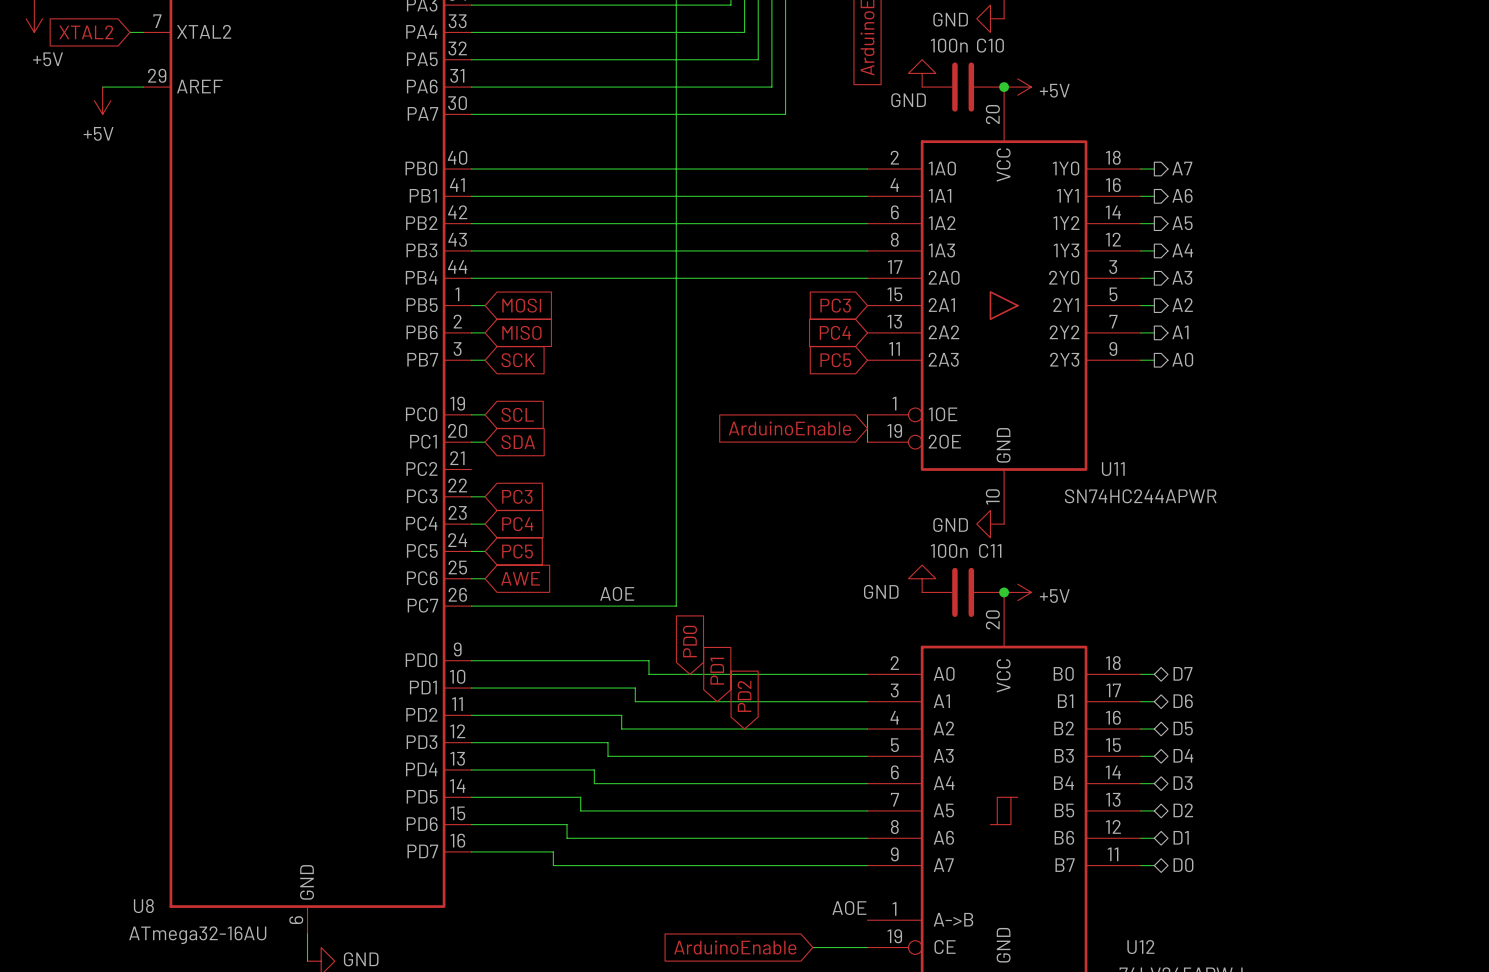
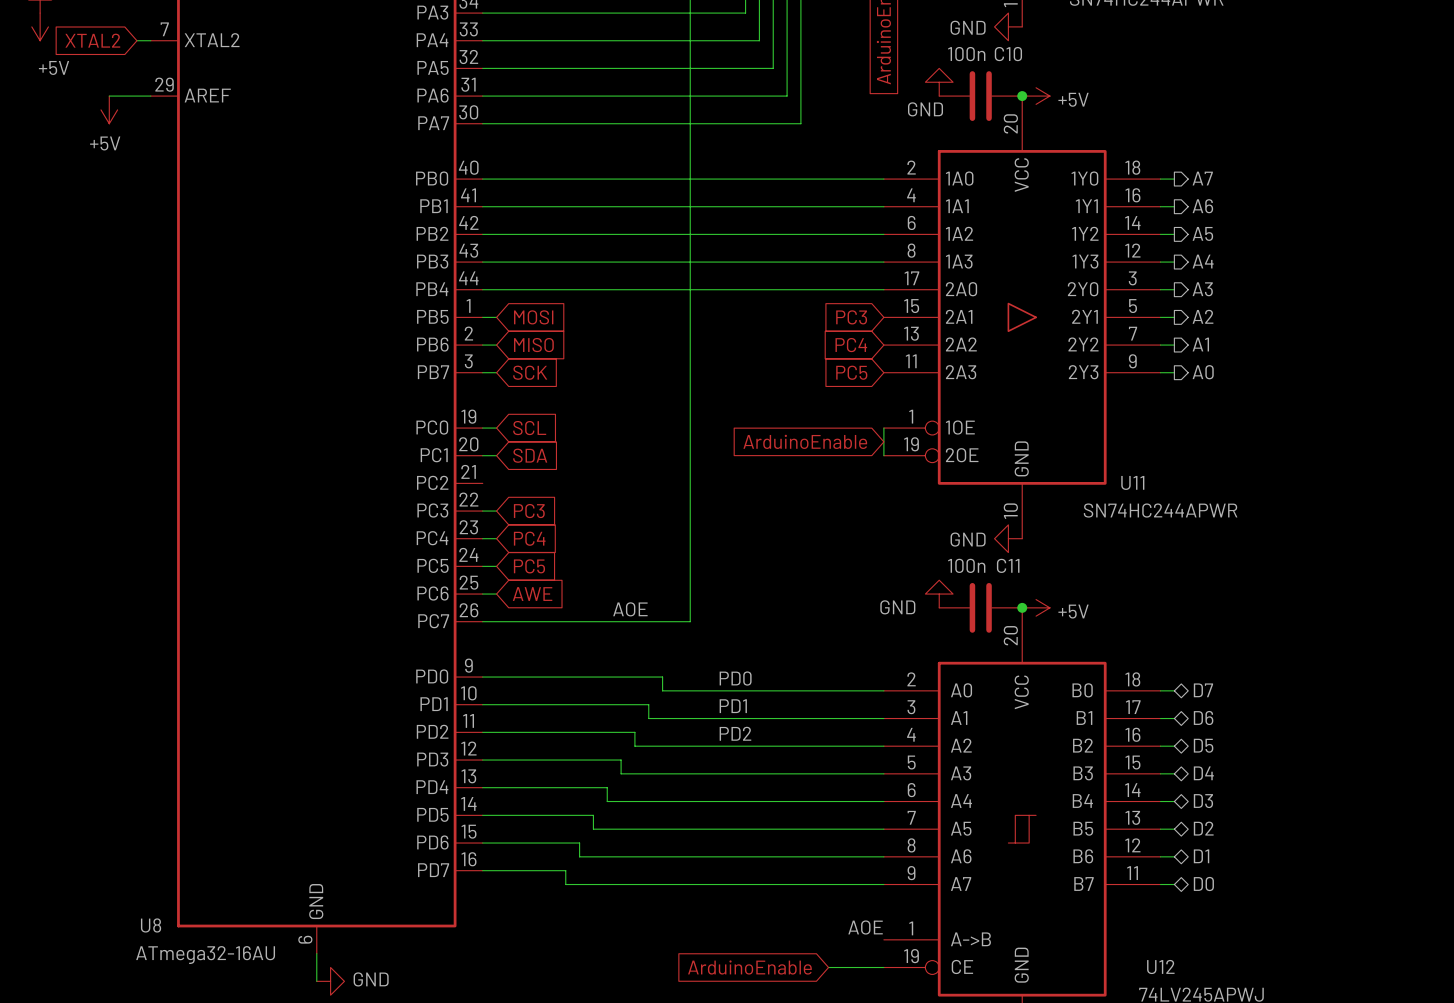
global label: PD0 (689, 641) -> none
label: none -> PD0 (735, 678)
global label: PD1 (717, 671) -> none
label: none -> PD1 (733, 706)
global label: PD2 (744, 696) -> none
label: none -> PD2 (735, 733)

